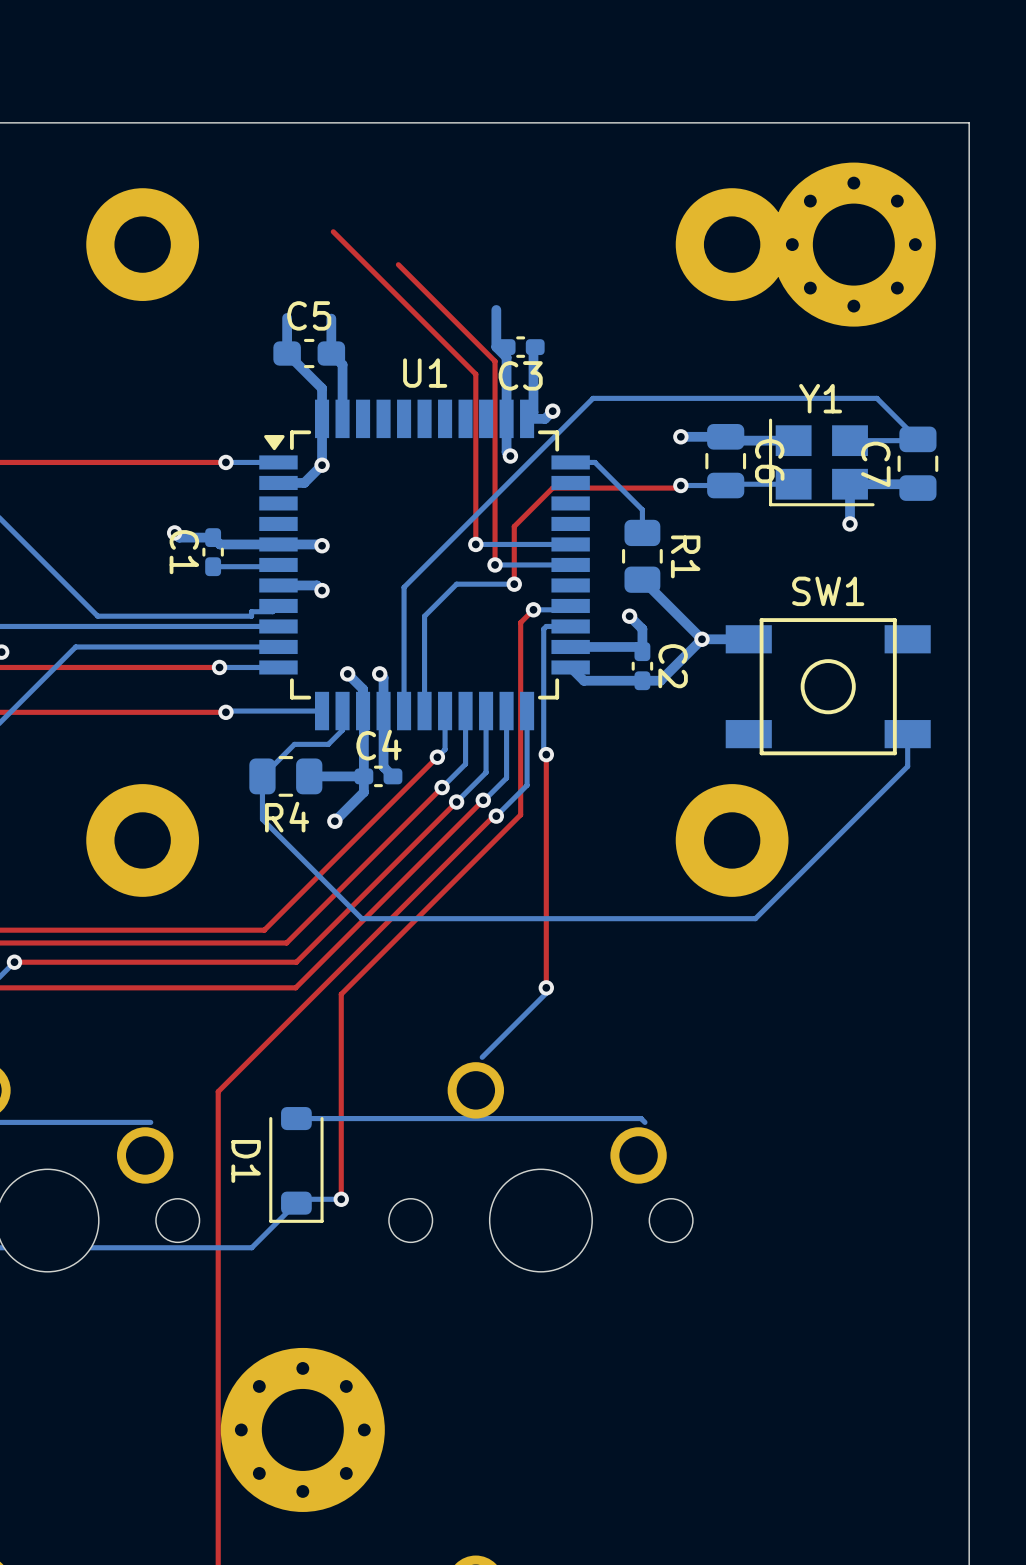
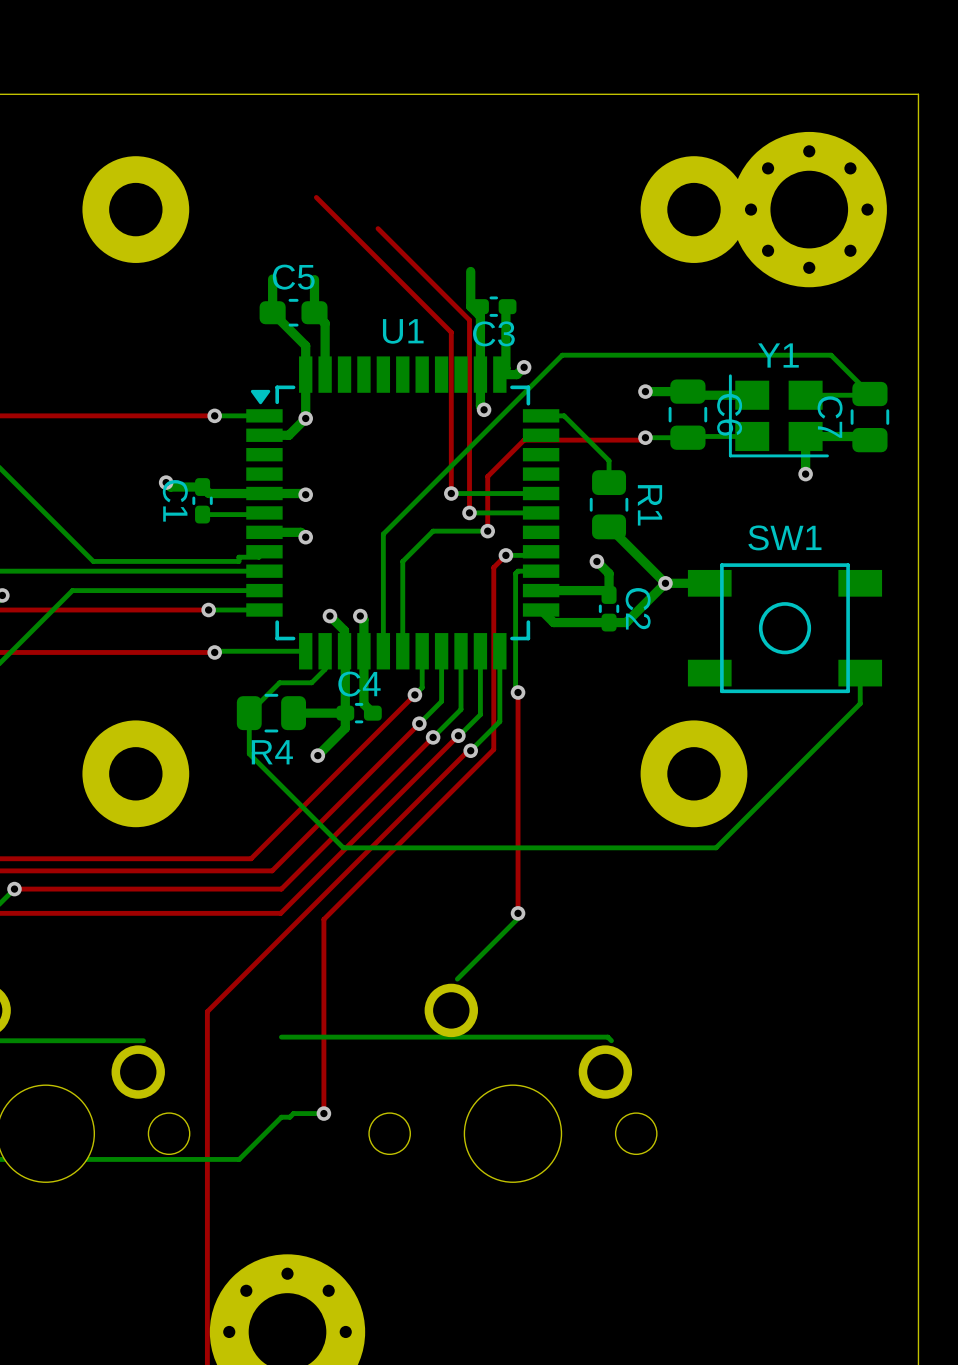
D1: (296, 1164) -> none

